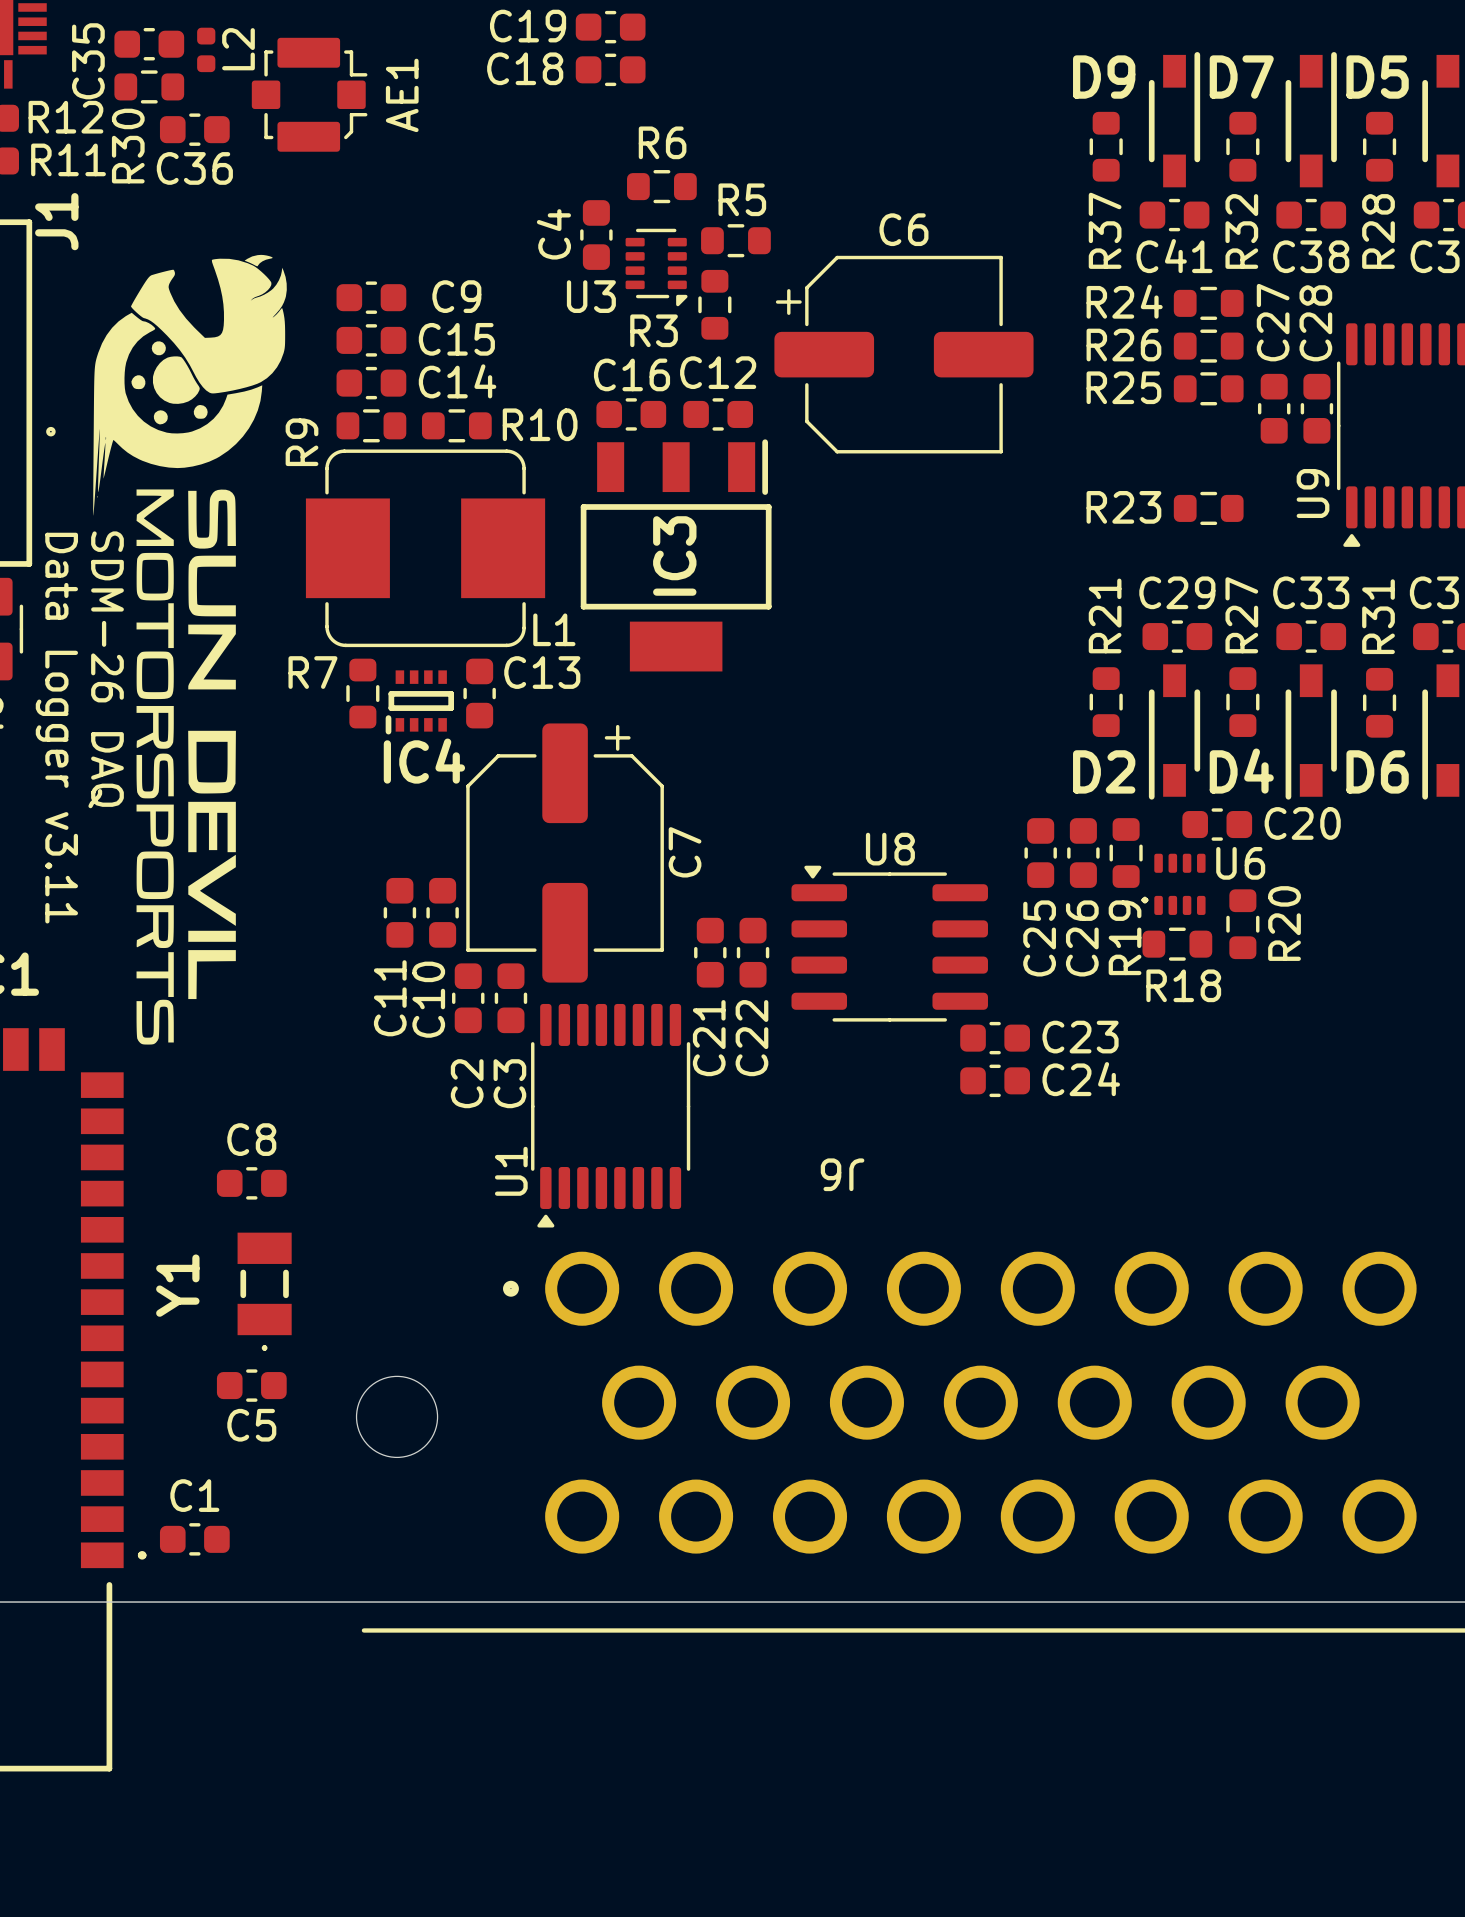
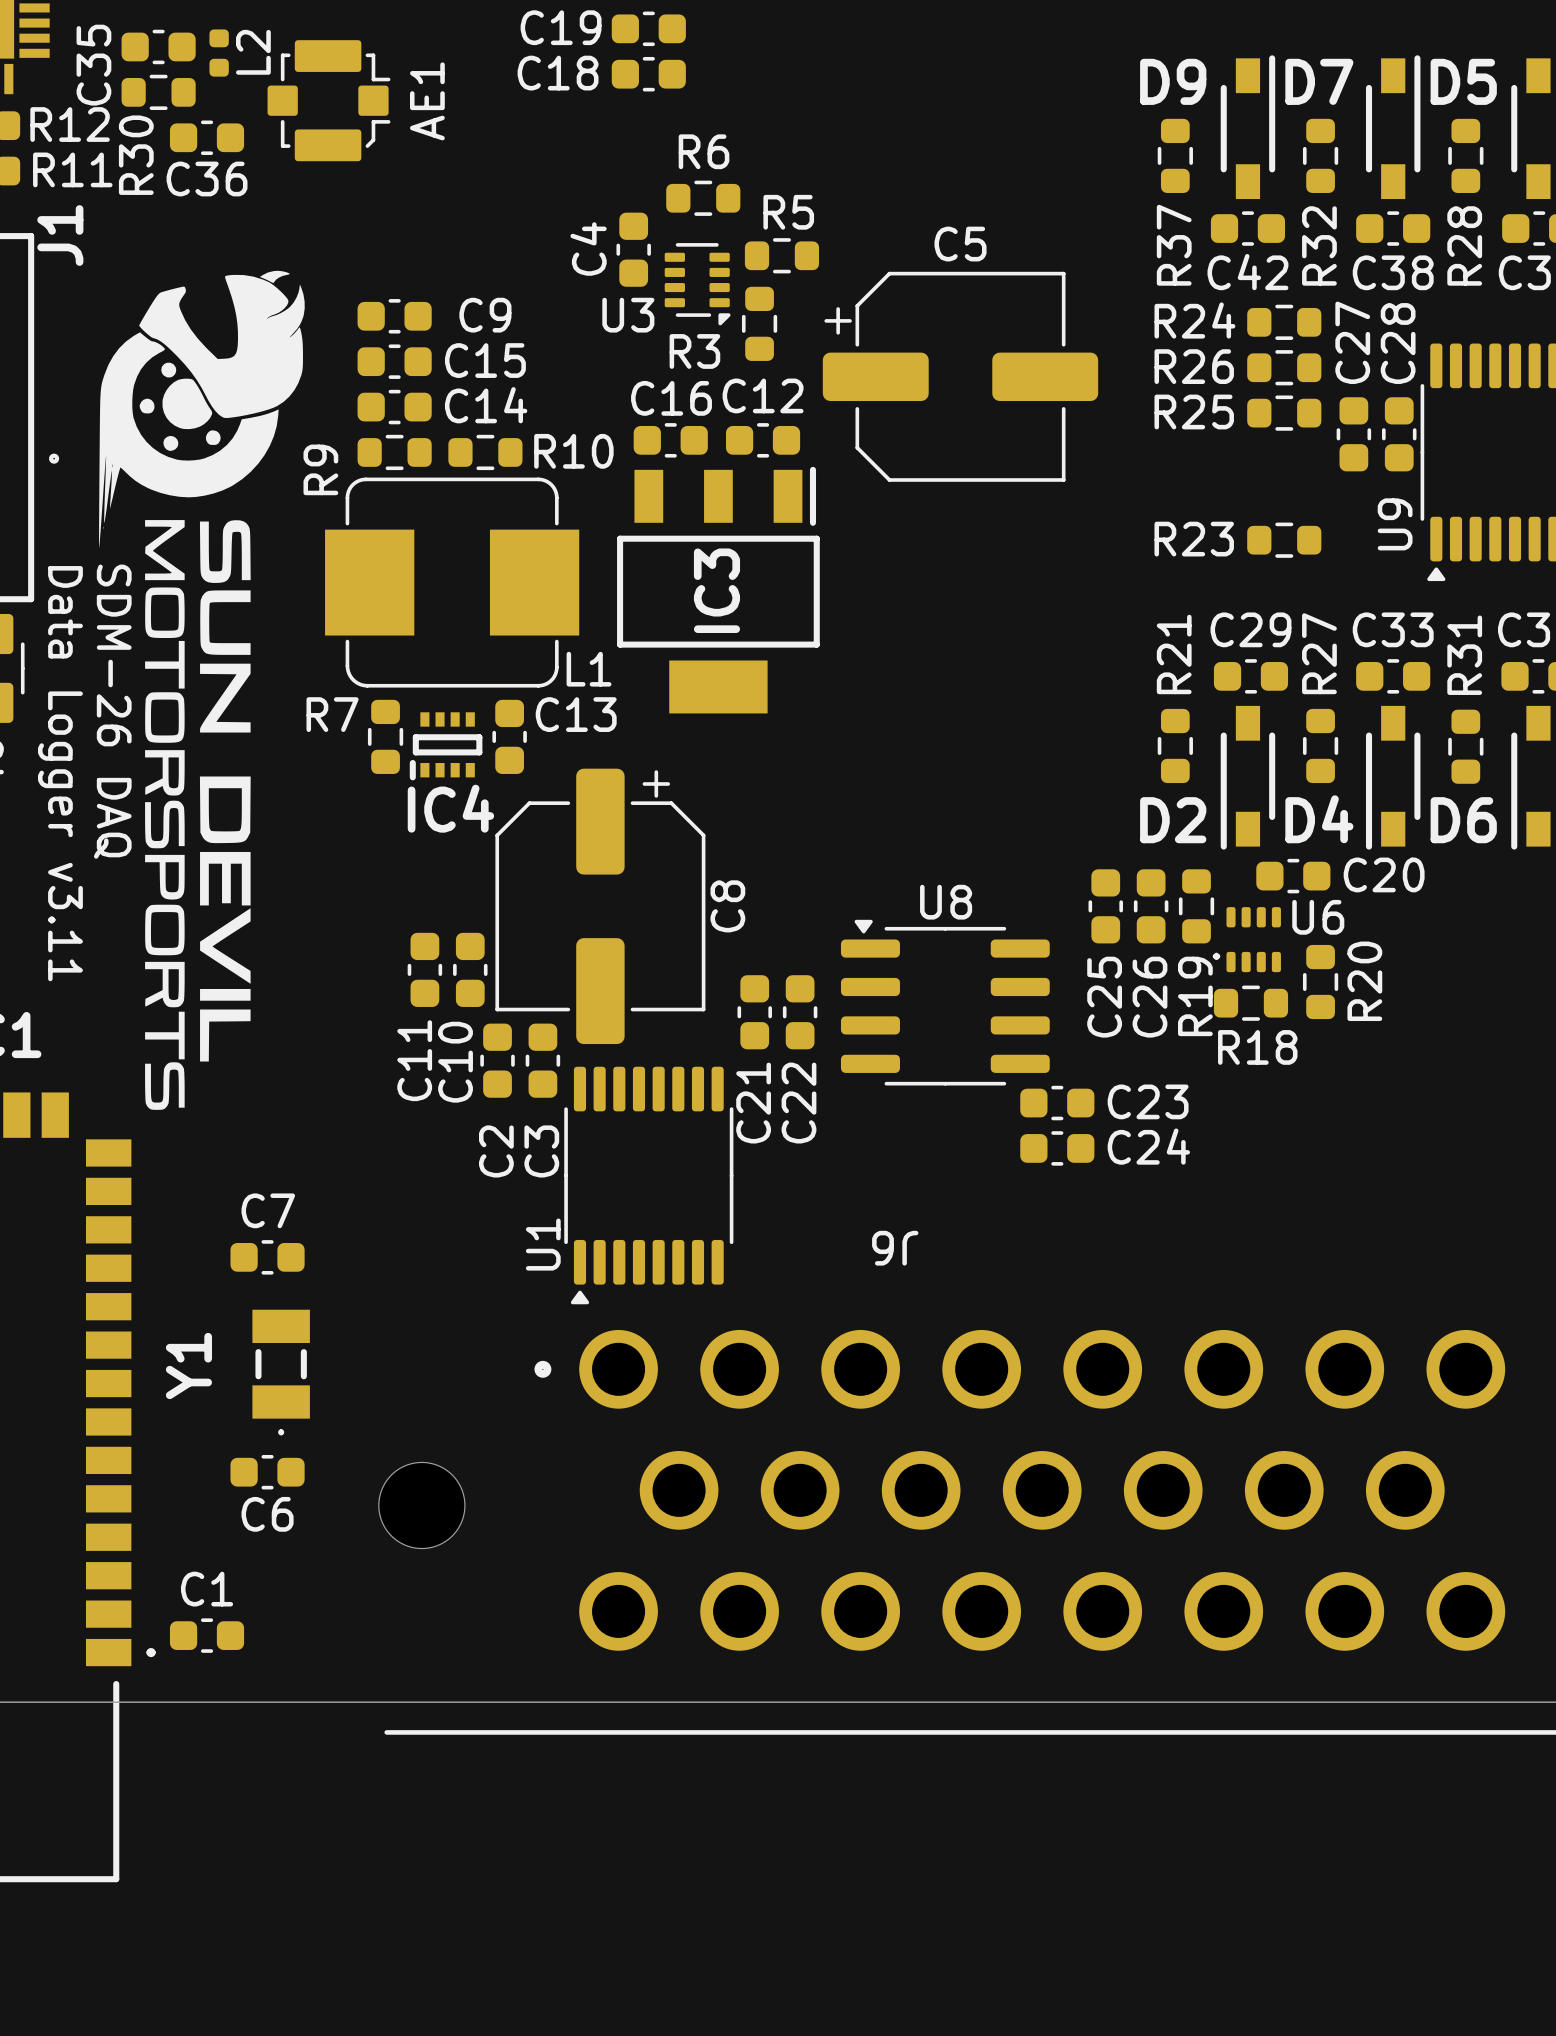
C6 name: C6 (903, 229) -> C5 (960, 244)
C41 name: C41 (1174, 256) -> C42 (1247, 272)
C7 name: C7 (685, 852) -> C8 (727, 906)
C8 name: C8 (251, 1139) -> C7 (268, 1210)
C5 name: C5 (251, 1425) -> C6 (267, 1514)

